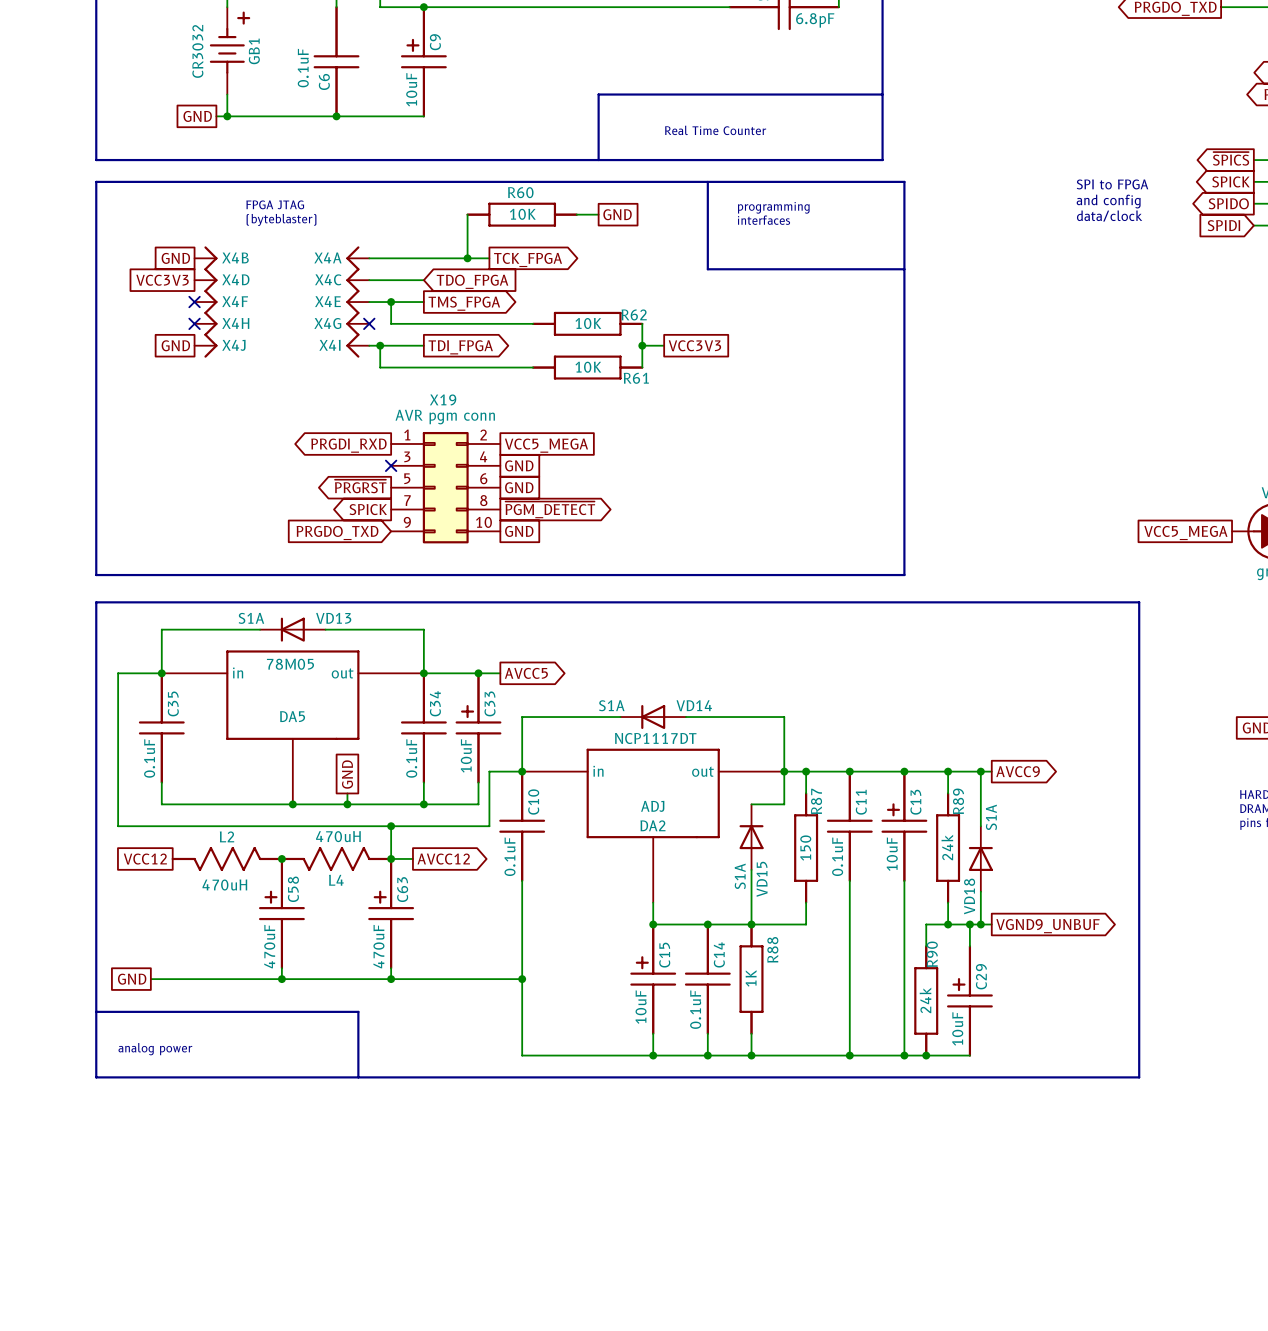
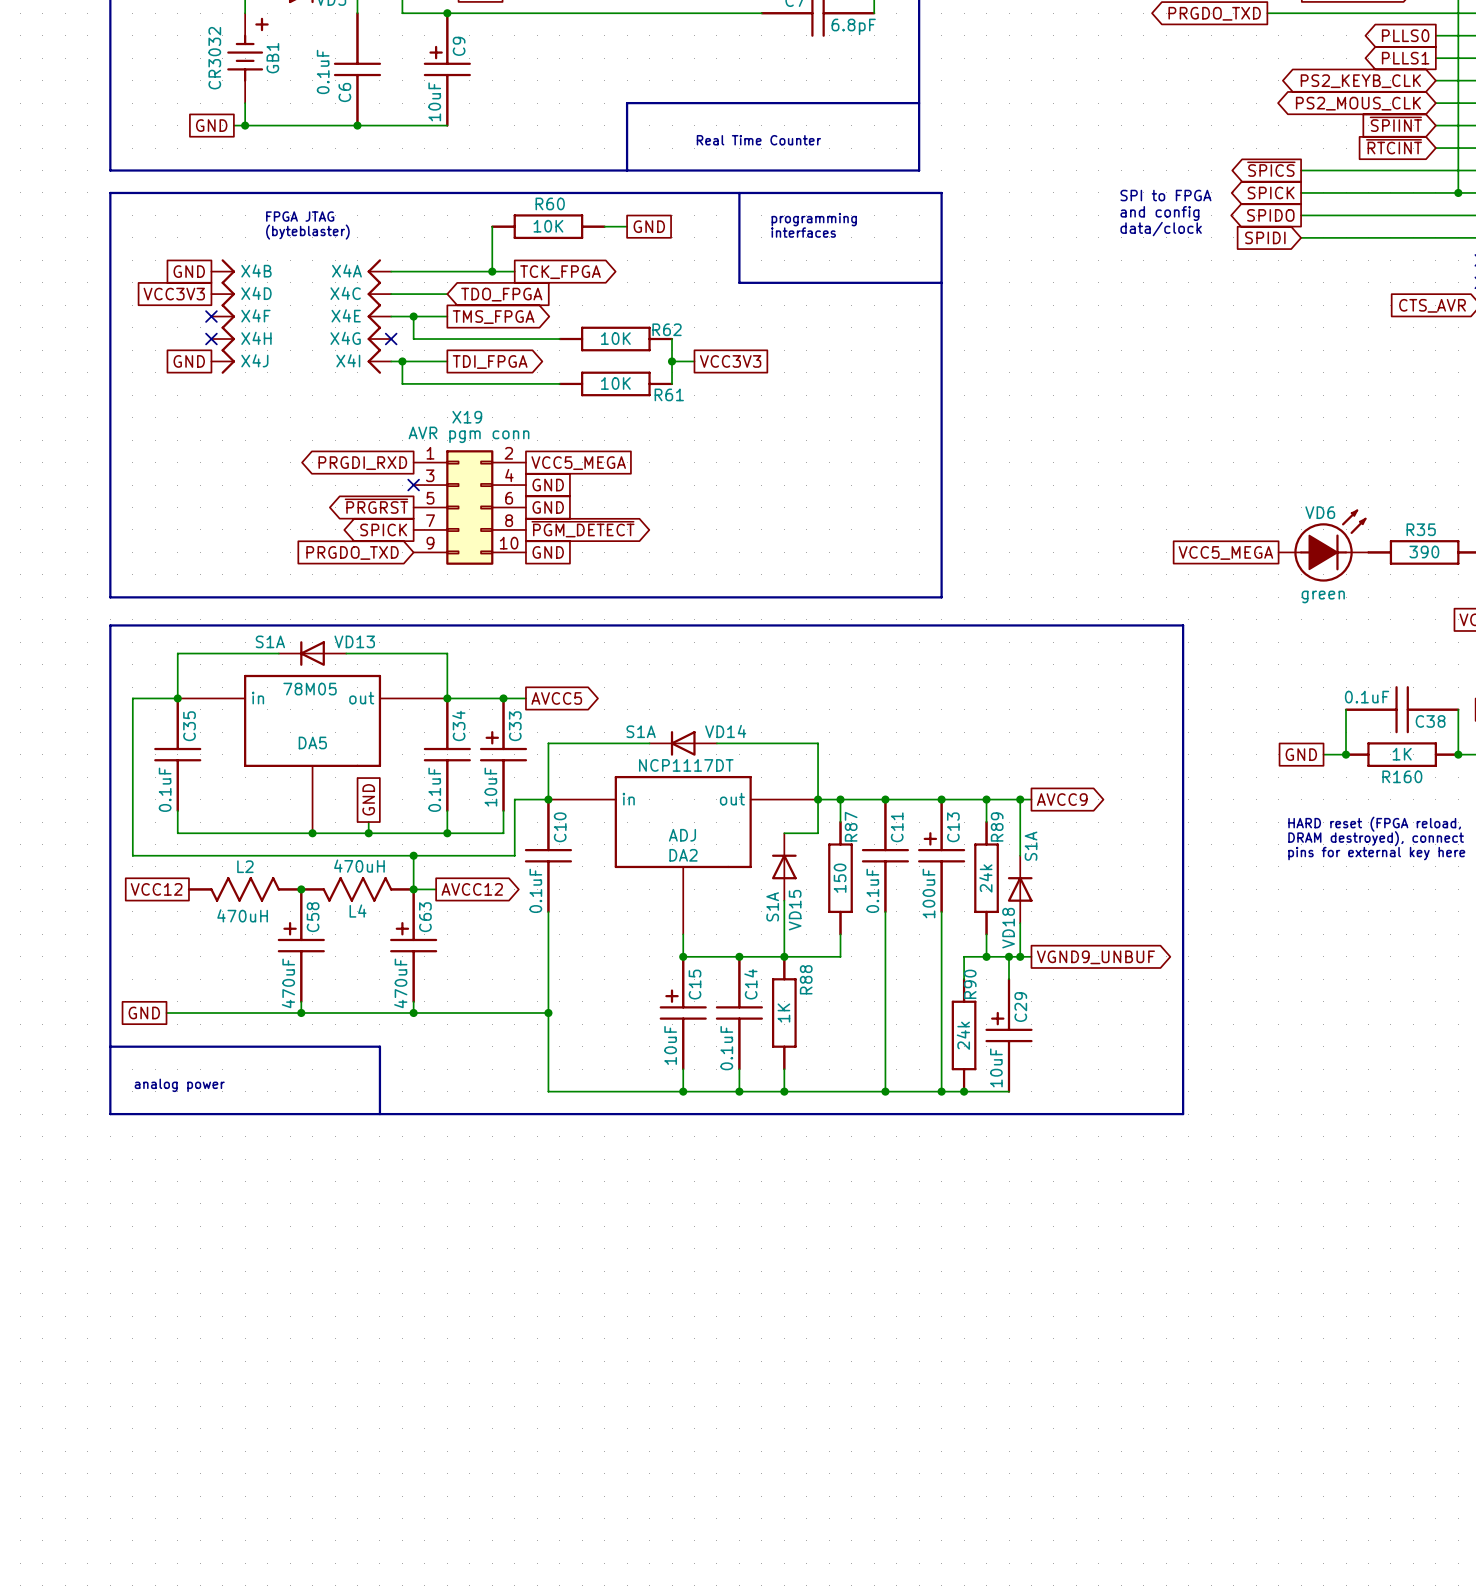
C13 value: 10uF (892, 854) -> 100uF (928, 893)

